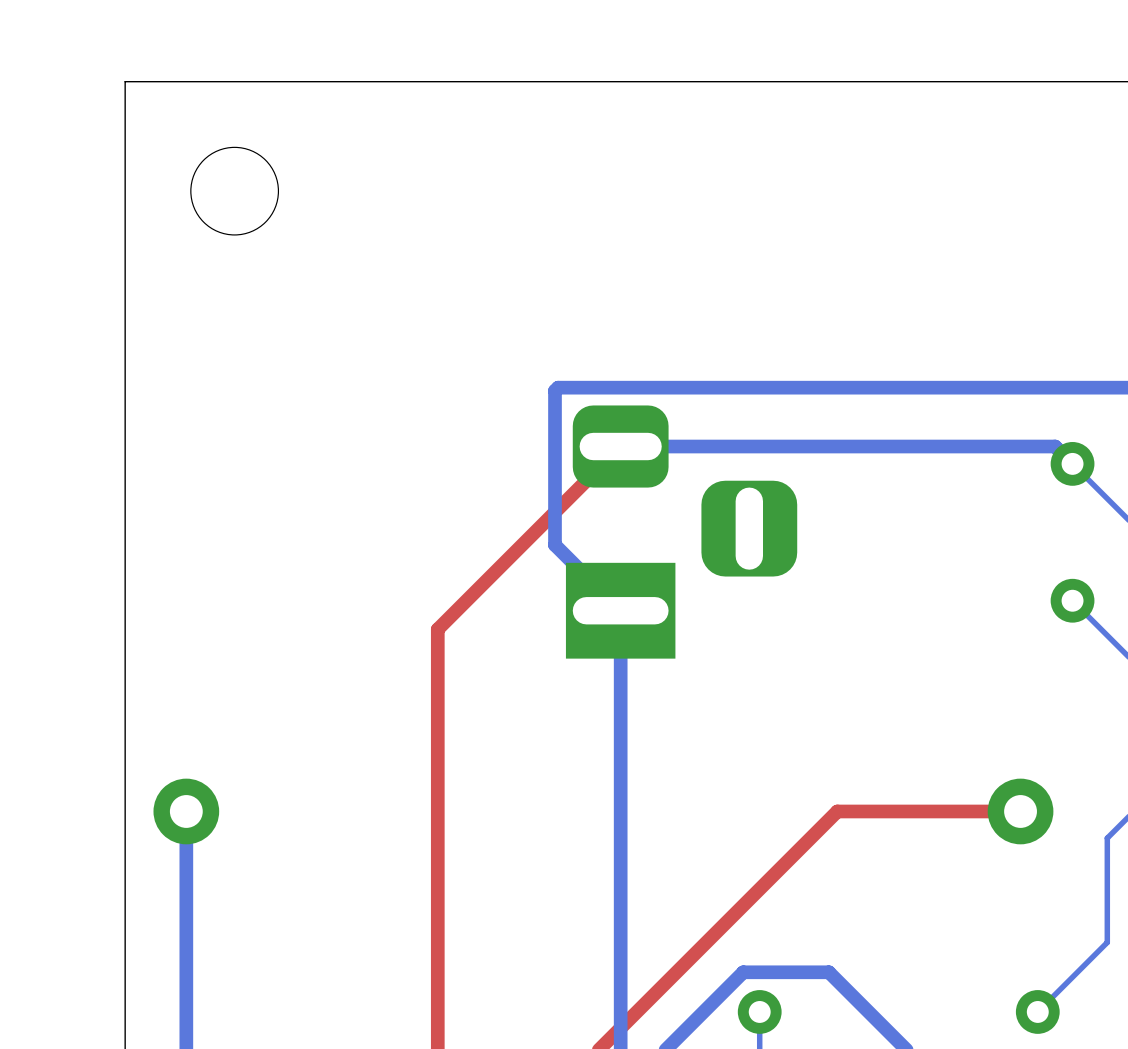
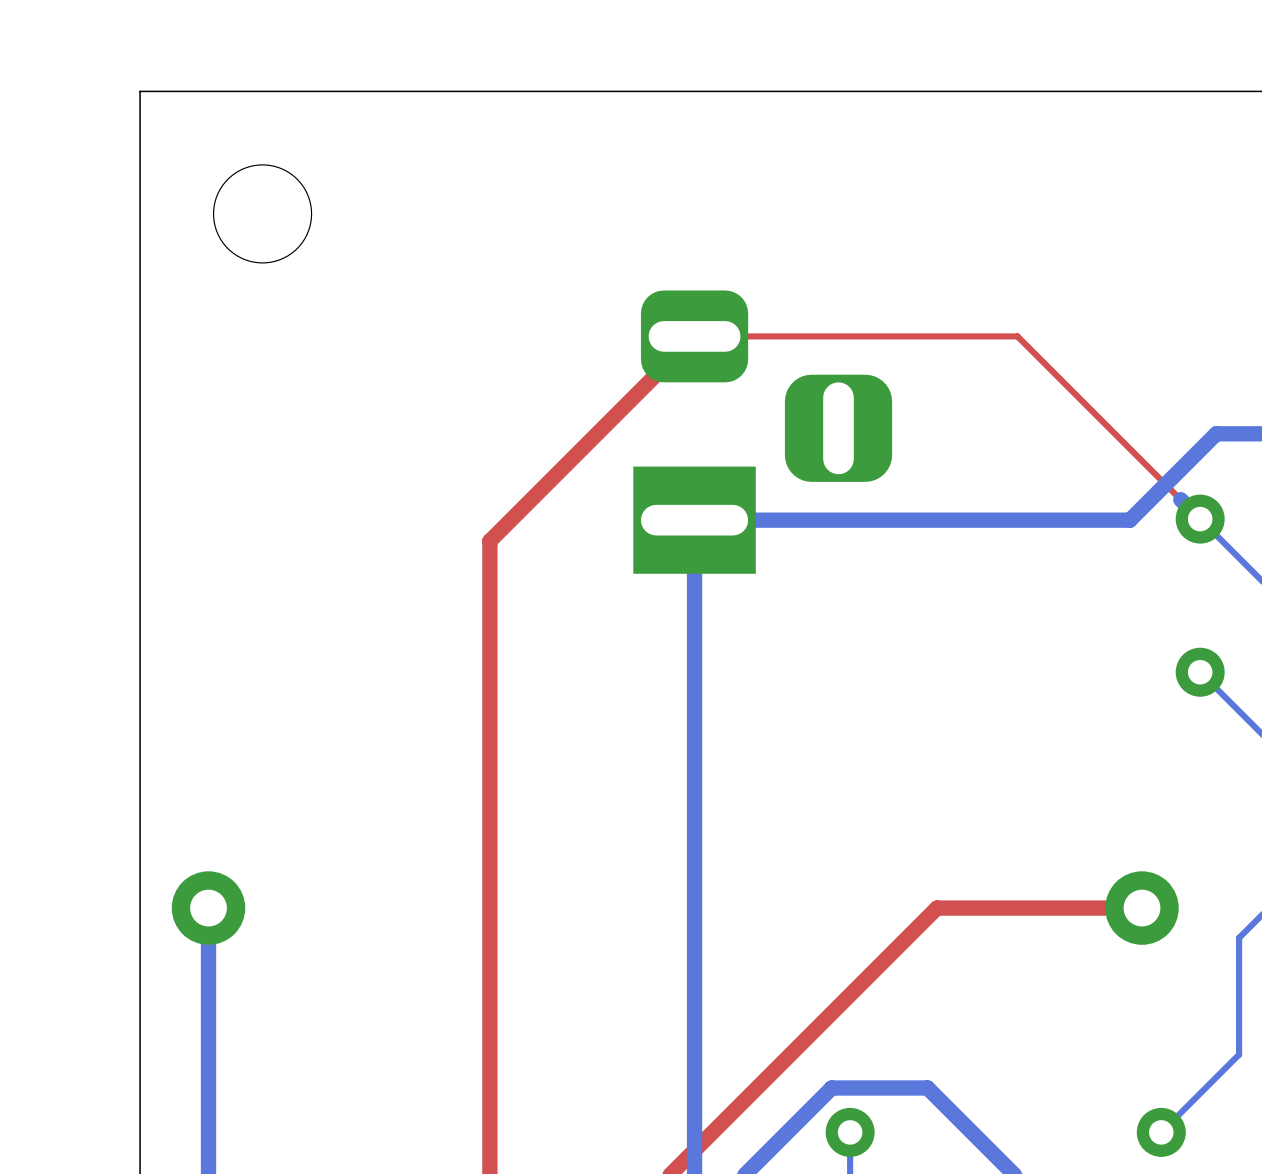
bottom track: (1086, 387) (558, 387) (554, 390) (554, 545) (620, 610) -> (1216, 433) (1129, 520) (694, 520) (694, 683)
top track: (620, 446) (437, 629) -> (1200, 519) (1017, 336) (694, 336) (489, 541) (489, 704)
bottom track: (1055, 446) (620, 446) -> none
part position: (681, 532) -> (762, 432)

